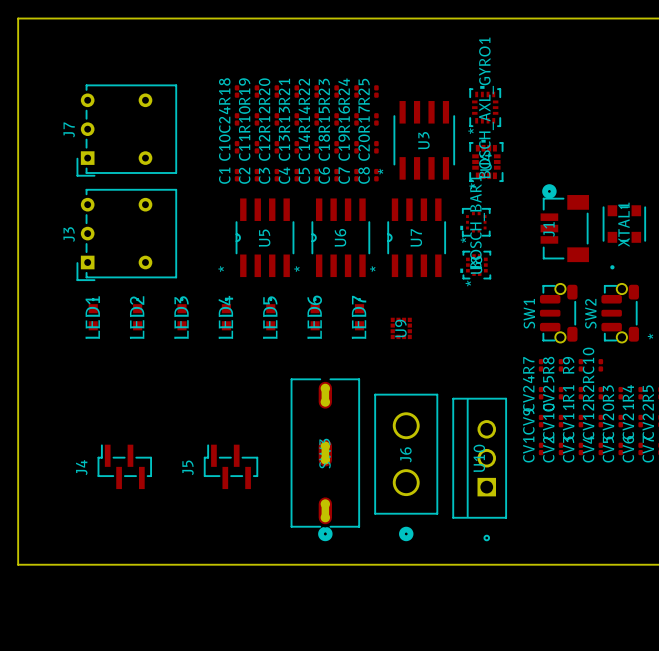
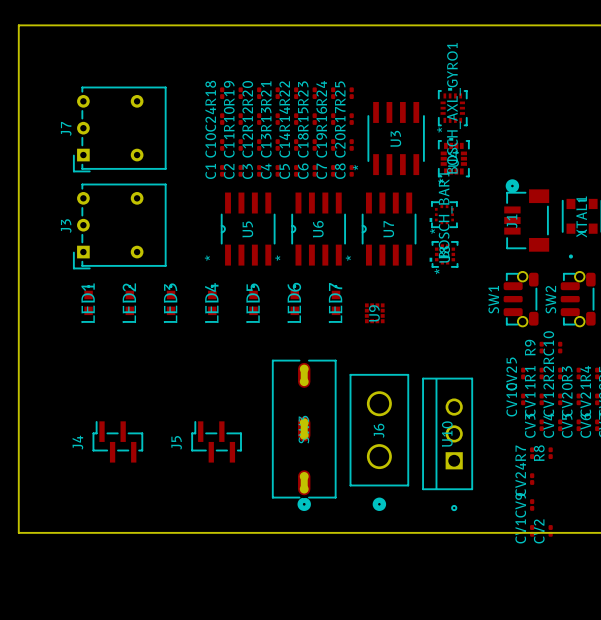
R7 position: (541, 365) -> (532, 453)
R8 position: (561, 365) -> (550, 453)
CV24 position: (541, 393) -> (532, 479)
CV9 position: (541, 421) -> (532, 504)
CV1 position: (541, 448) -> (532, 530)
CV2 position: (561, 448) -> (550, 530)

